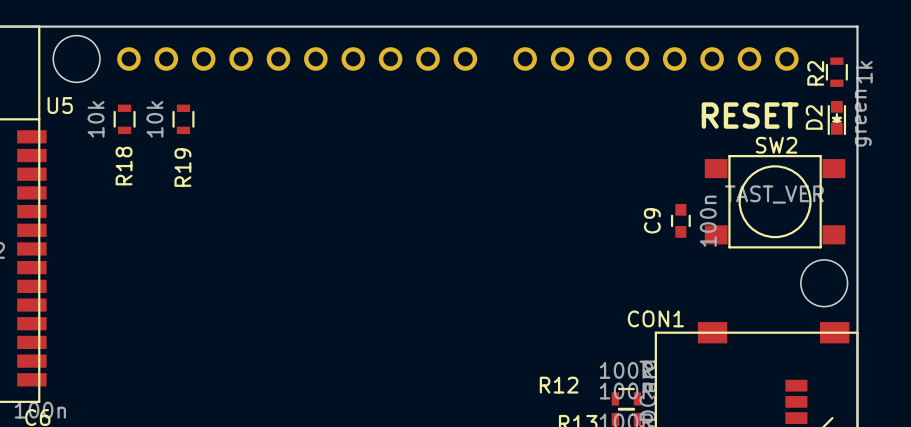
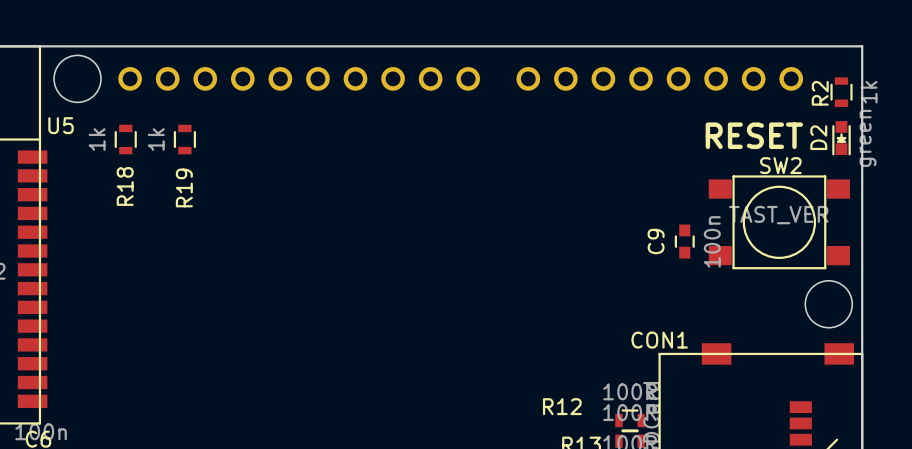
R18 value: 10k (96, 119) -> 1k (97, 139)
R19 value: 10k (154, 119) -> 1k (156, 139)

